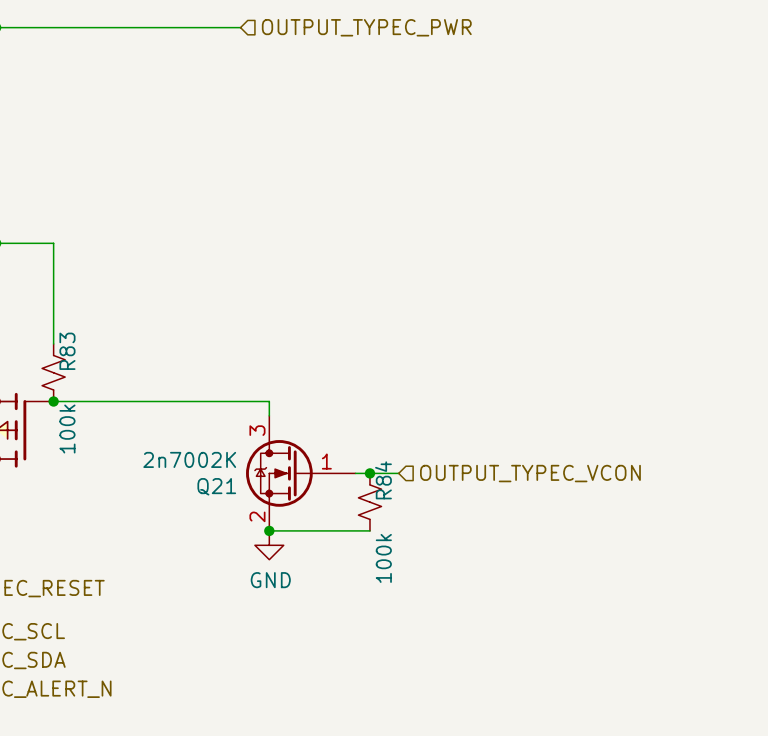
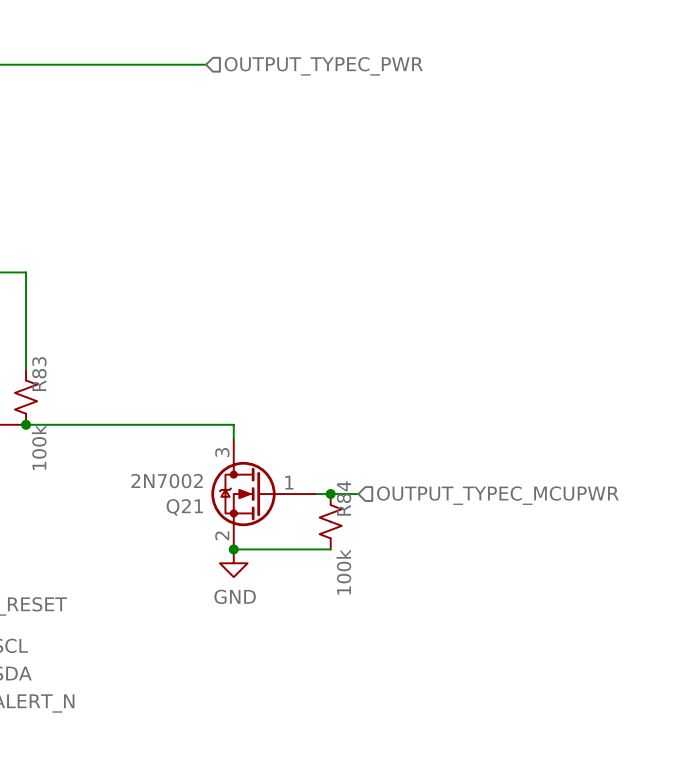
Q21 value: 2n7002K (189, 459) -> 2N7002 (167, 481)
hierarchical label: OUTPUT_TYPEC_VCON (530, 473) -> OUTPUT_TYPEC_MCUPWR (497, 495)

